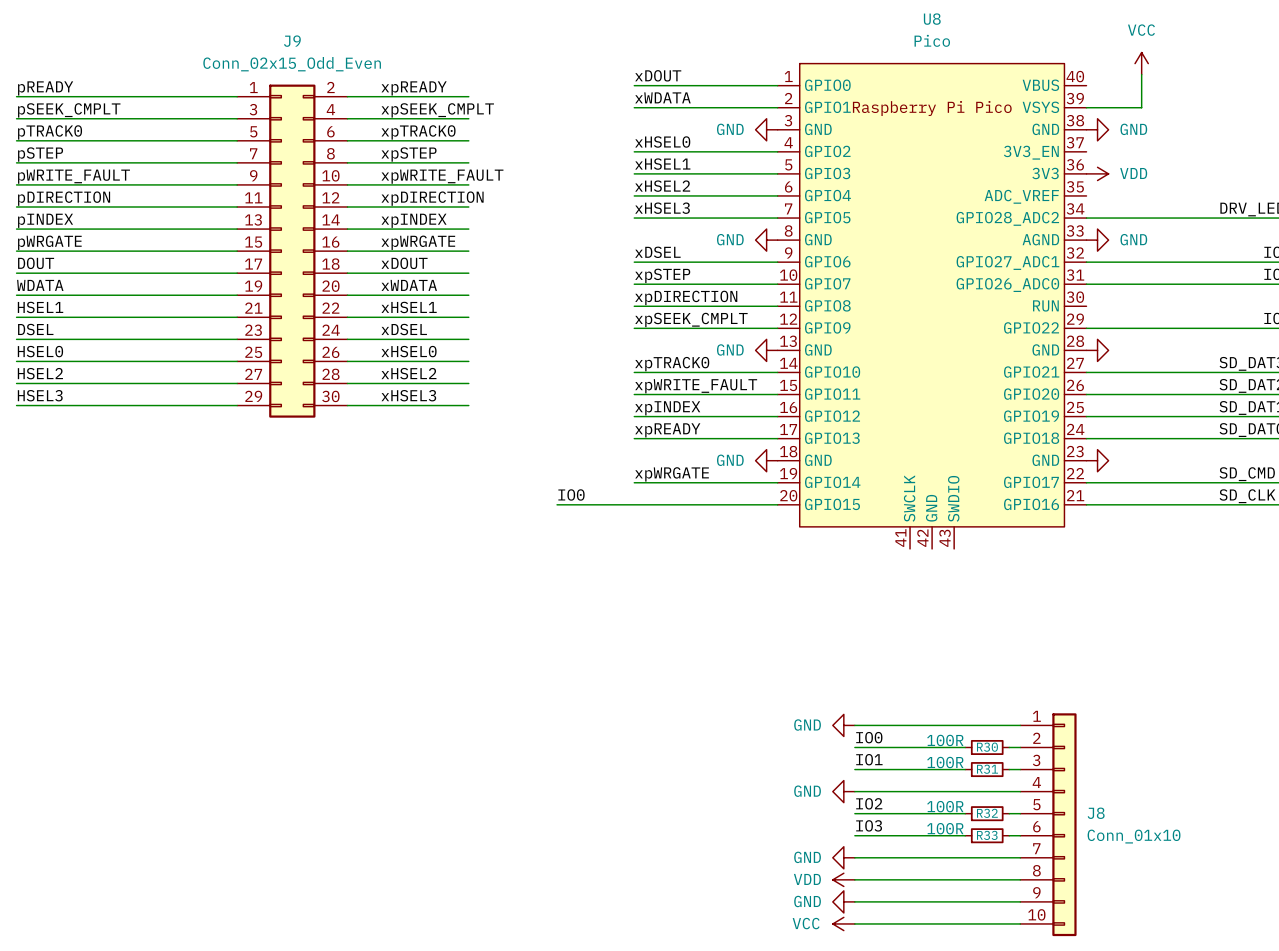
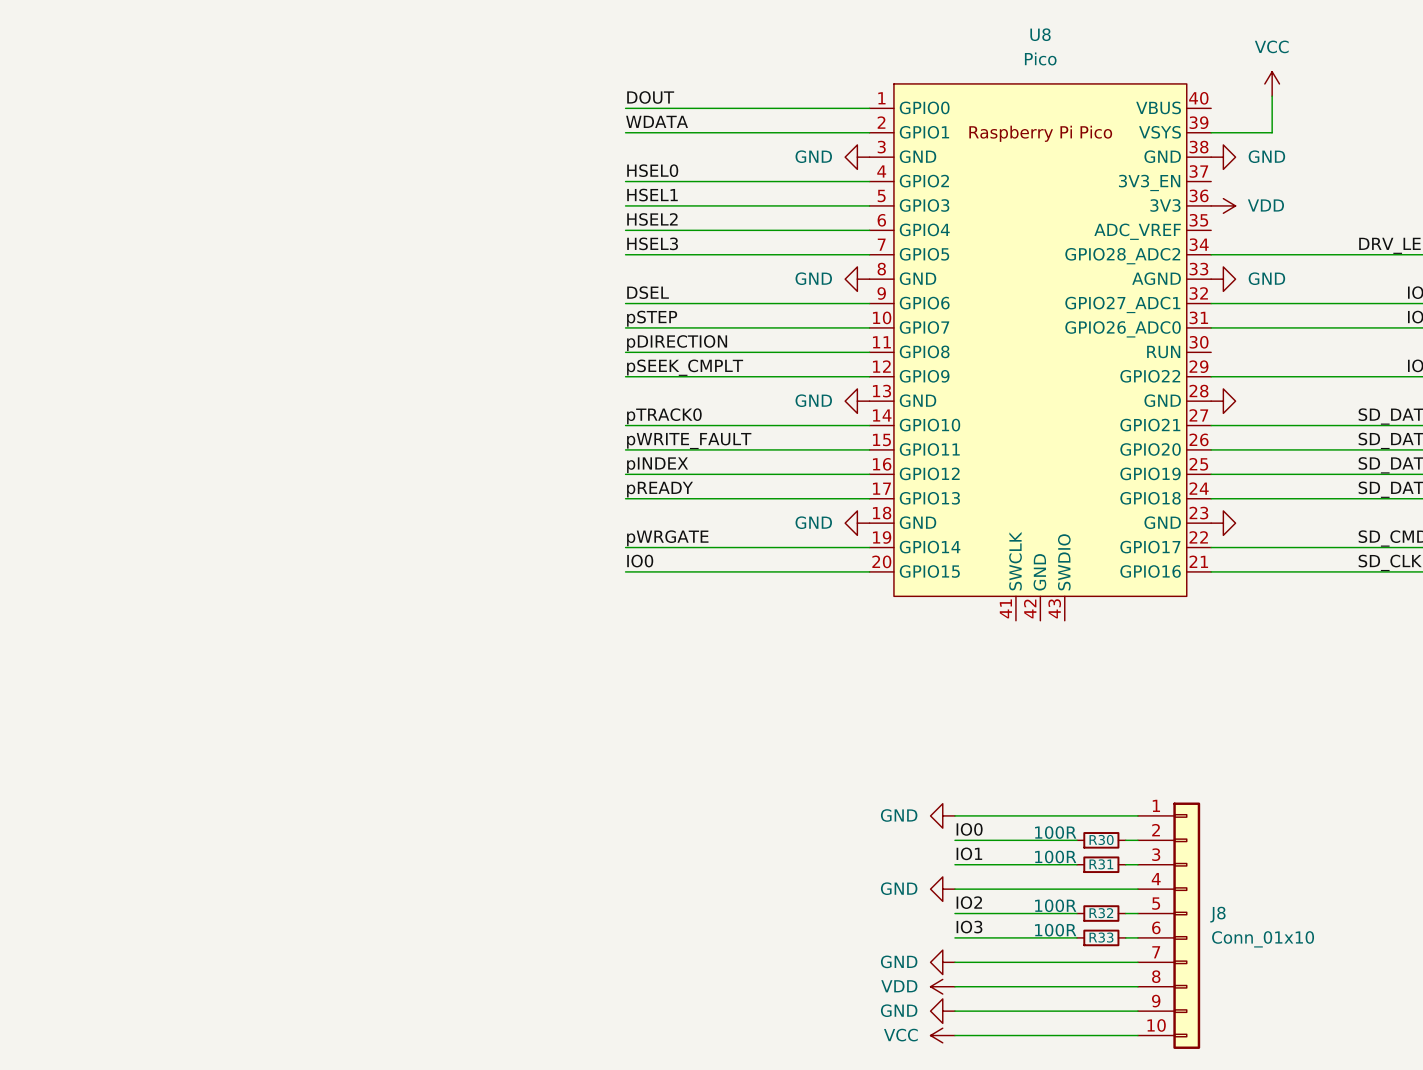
label: none -> DOUT (650, 97)
label: xDOUT (658, 75) -> none
wire: none -> (625, 108) (710, 108)
label: pREADY (45, 88) -> none
label: xpREADY (414, 88) -> none
wire: (16, 96) (237, 96) -> none
wire: (347, 96) (468, 96) -> none
label: none -> WDATA (657, 121)
label: xWDATA (662, 97) -> none
wire: none -> (625, 132) (710, 132)
label: pSEEK_CMPLT (69, 110) -> none
label: xpSEEK_CMPLT (437, 110) -> none
wire: (16, 118) (237, 118) -> none
wire: (347, 118) (468, 118) -> none
label: pTRACK0 (50, 132) -> none
label: xpTRACK0 (418, 132) -> none
wire: (16, 140) (237, 140) -> none
wire: (347, 140) (468, 140) -> none
label: none -> HSEL0 (652, 170)
label: xHSEL0 (662, 142) -> none
wire: none -> (625, 181) (710, 181)
label: pSTEP (40, 154) -> none
label: xpSTEP (409, 154) -> none
wire: (16, 162) (237, 162) -> none
wire: (347, 162) (468, 162) -> none
label: none -> HSEL1 (652, 195)
label: xHSEL1 (662, 164) -> none
wire: none -> (625, 205) (710, 205)
label: pWRITE_FAULT (74, 176) -> none
label: xpWRITE_FAULT (442, 176) -> none
wire: (16, 184) (237, 184) -> none
wire: (347, 184) (468, 184) -> none
label: none -> HSEL2 (652, 219)
label: xHSEL2 (662, 186) -> none
wire: none -> (625, 230) (710, 230)
label: pDIRECTION (64, 198) -> none
label: xpDIRECTION (432, 198) -> none
wire: (16, 207) (237, 207) -> none
wire: (347, 207) (468, 207) -> none
label: none -> HSEL3 (652, 243)
label: xHSEL3 (662, 208) -> none
wire: none -> (625, 254) (710, 254)
label: pINDEX (45, 220) -> none
label: xpINDEX (414, 220) -> none
wire: (16, 229) (237, 229) -> none
wire: (347, 229) (468, 229) -> none
label: pWRGATE (49, 242) -> none
label: xpWRGATE (418, 242) -> none
wire: (16, 251) (237, 251) -> none
J9: Conn_02x15_Odd_Even (292, 251) -> none
wire: (347, 251) (468, 251) -> none
label: none -> DSEL (648, 292)
label: xDSEL (657, 252) -> none
wire: none -> (625, 303) (710, 303)
label: DOUT (36, 263) -> none
label: xDOUT (404, 263) -> none
wire: (16, 273) (237, 273) -> none
wire: (347, 273) (468, 273) -> none
label: none -> pSTEP (652, 318)
label: xpSTEP (662, 275) -> none
wire: none -> (625, 327) (710, 327)
label: WDATA (40, 285) -> none
label: xWDATA (409, 285) -> none
wire: (16, 295) (237, 295) -> none
wire: (347, 295) (468, 295) -> none
label: xpDIRECTION (686, 297) -> pDIRECTION (677, 343)
wire: none -> (625, 352) (710, 352)
label: HSEL1 (40, 307) -> none
label: xHSEL1 (409, 307) -> none
wire: (16, 317) (237, 317) -> none
wire: (347, 317) (468, 317) -> none
label: xpSEEK_CMPLT (691, 319) -> pSEEK_CMPLT (685, 367)
wire: none -> (625, 376) (710, 376)
label: DSEL (35, 329) -> none
label: xDSEL (404, 329) -> none
wire: (16, 339) (237, 339) -> none
wire: (347, 339) (468, 339) -> none
label: HSEL0 (40, 351) -> none
label: xHSEL0 (409, 351) -> none
wire: (16, 361) (237, 361) -> none
wire: (347, 361) (468, 361) -> none
label: xpTRACK0 (672, 364) -> pTRACK0 (664, 416)
wire: none -> (625, 425) (710, 425)
label: HSEL2 (40, 373) -> none
label: xHSEL2 (408, 373) -> none
wire: (16, 383) (237, 383) -> none
wire: (347, 383) (468, 383) -> none
label: xpWRITE_FAULT (696, 386) -> pWRITE_FAULT (689, 441)
wire: none -> (625, 449) (710, 449)
label: HSEL3 (40, 395) -> none
label: xHSEL3 (408, 395) -> none
wire: (16, 405) (237, 405) -> none
wire: (347, 405) (468, 405) -> none
label: none -> pINDEX (657, 465)
label: xpINDEX (667, 408) -> none
wire: none -> (625, 474) (710, 474)
label: none -> pREADY (660, 489)
label: xpREADY (667, 430) -> none
wire: none -> (625, 498) (710, 498)
label: xpWRGATE (672, 474) -> pWRGATE (667, 538)
wire: none -> (625, 547) (710, 547)

